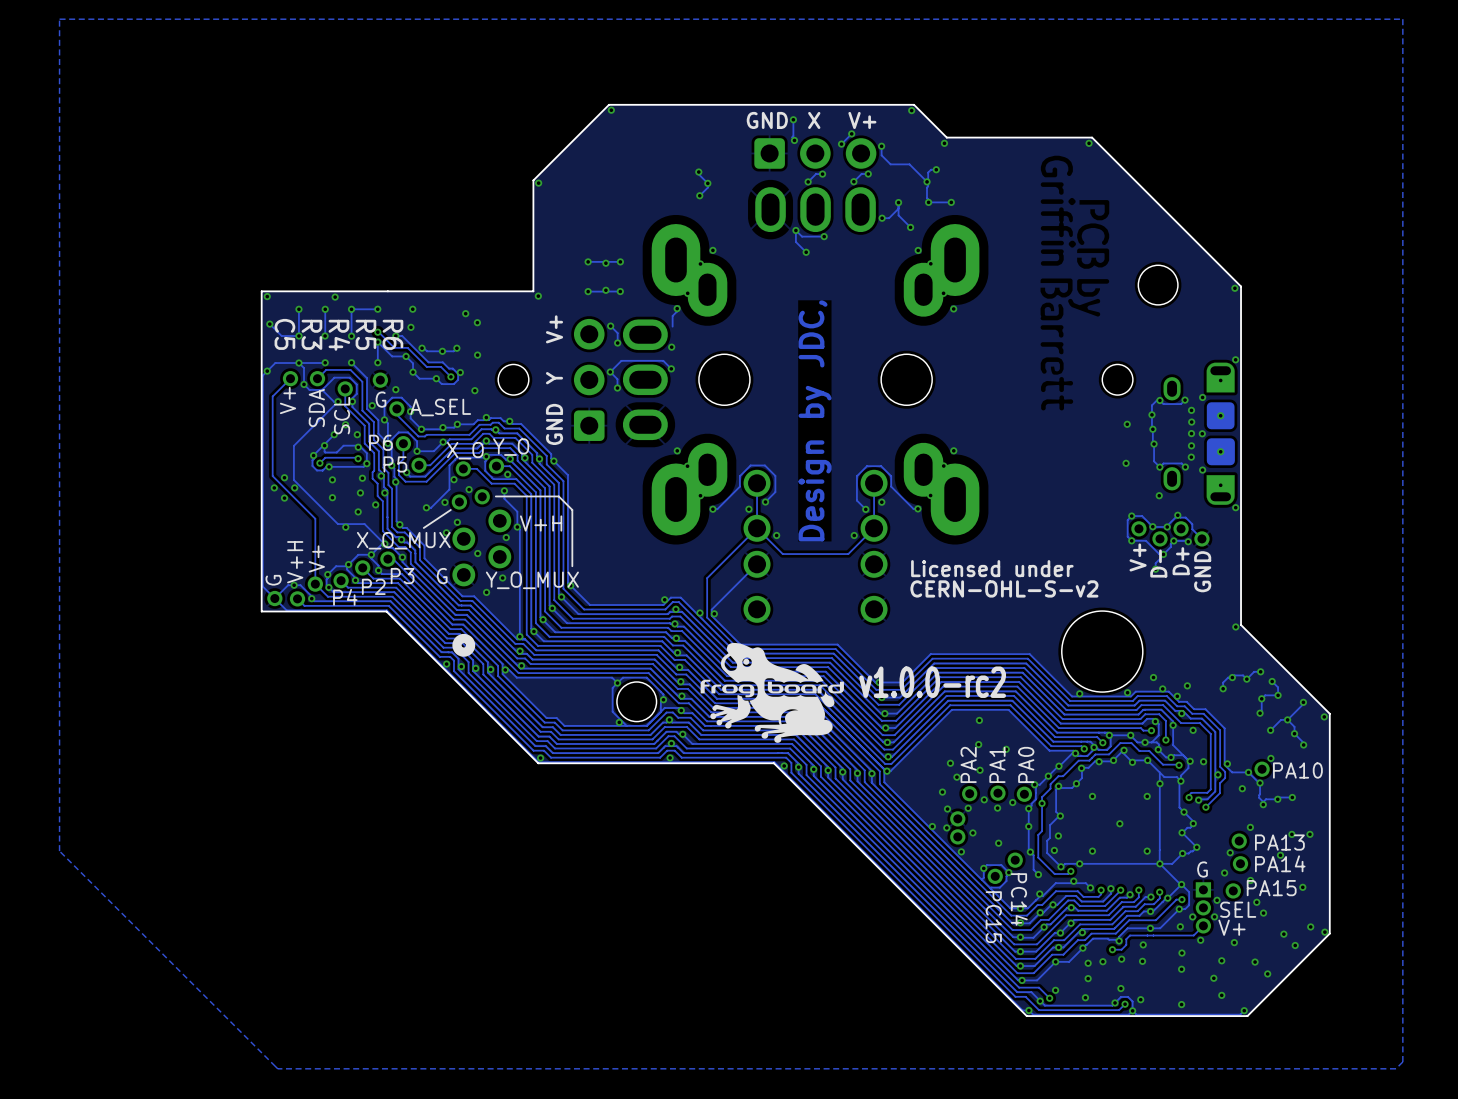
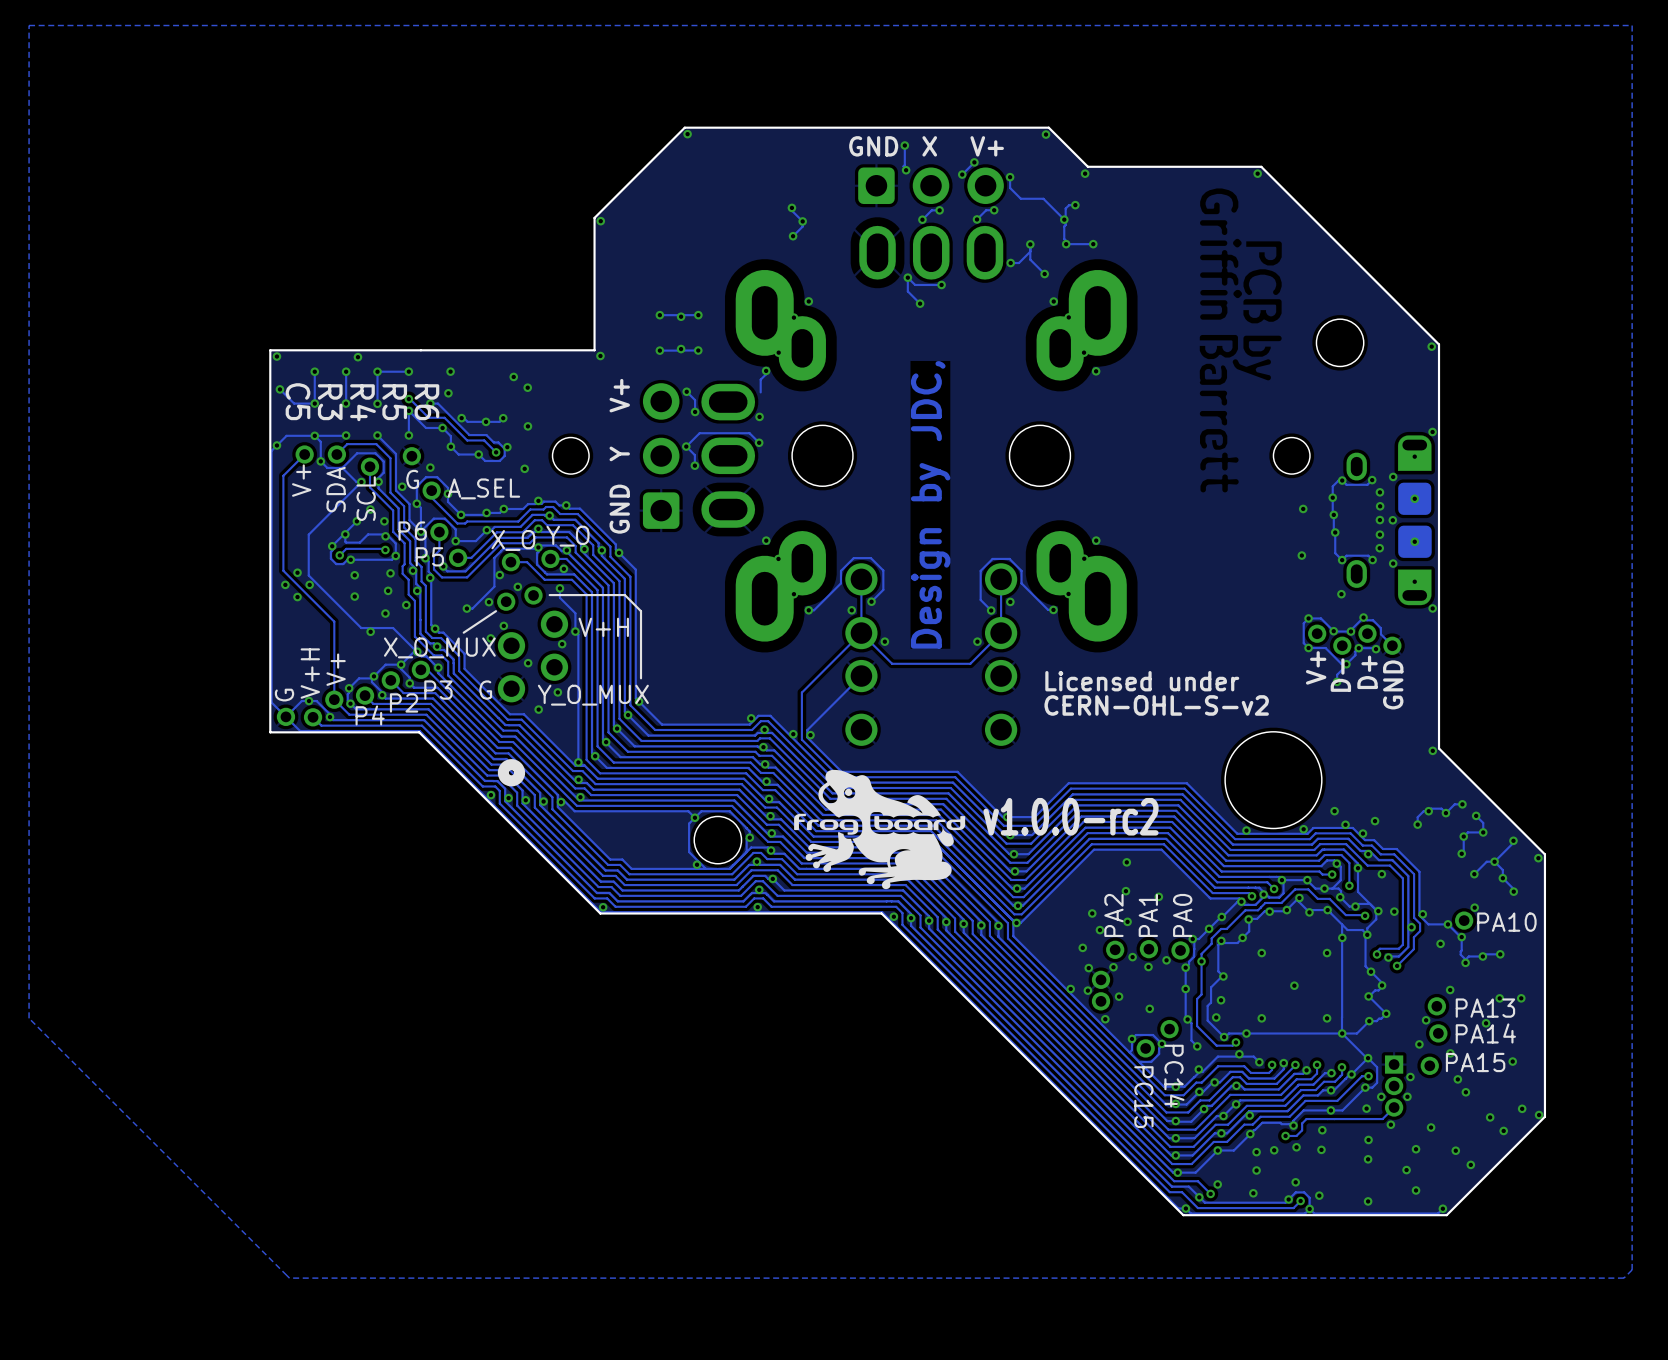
text: G (1202, 869) -> none
text: SEL (1238, 909) -> none
text: V+ (1231, 927) -> none

